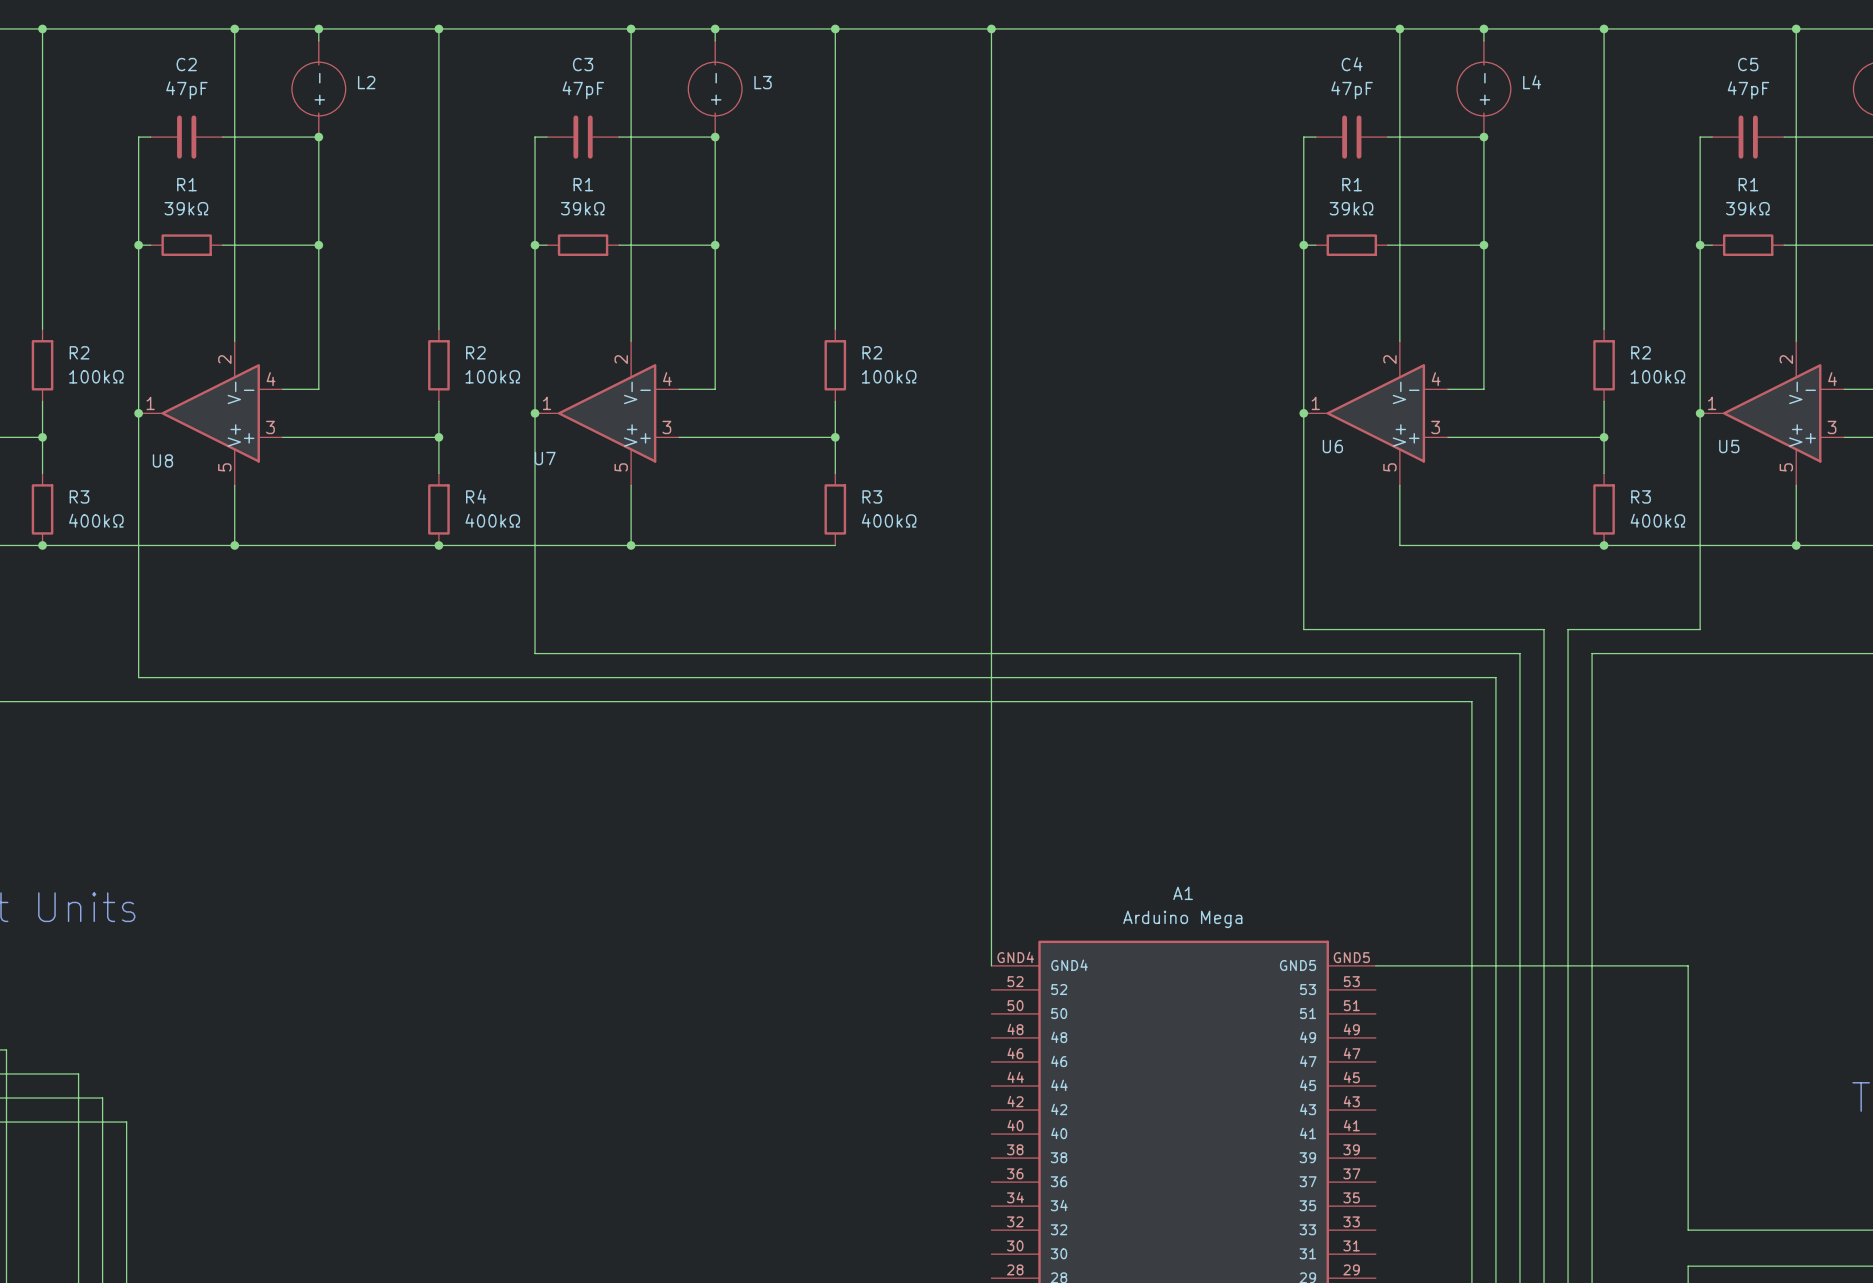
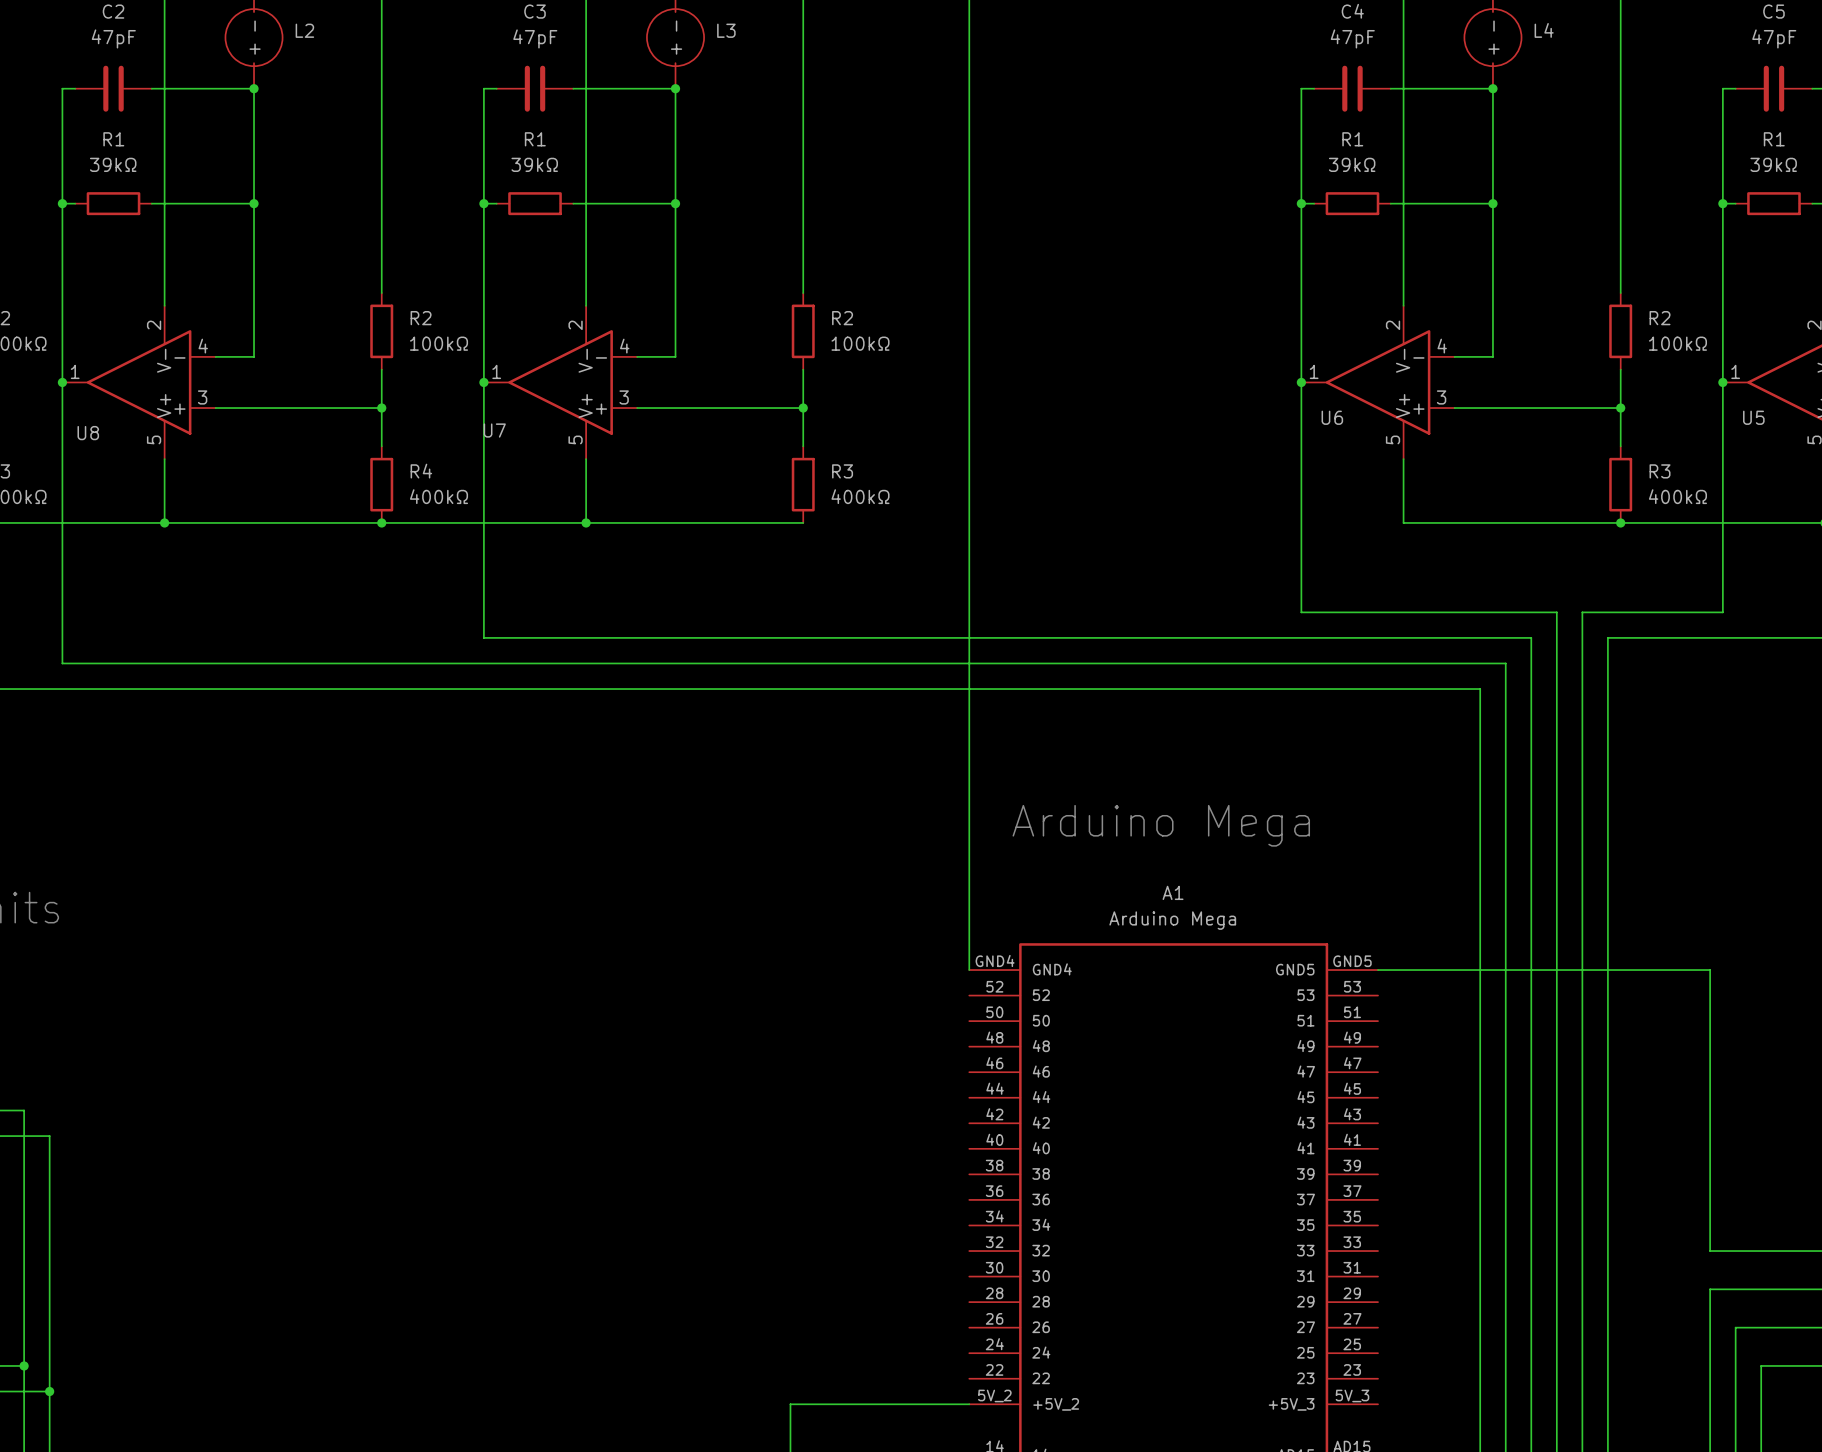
text: none -> Arduino Mega (1161, 825)

